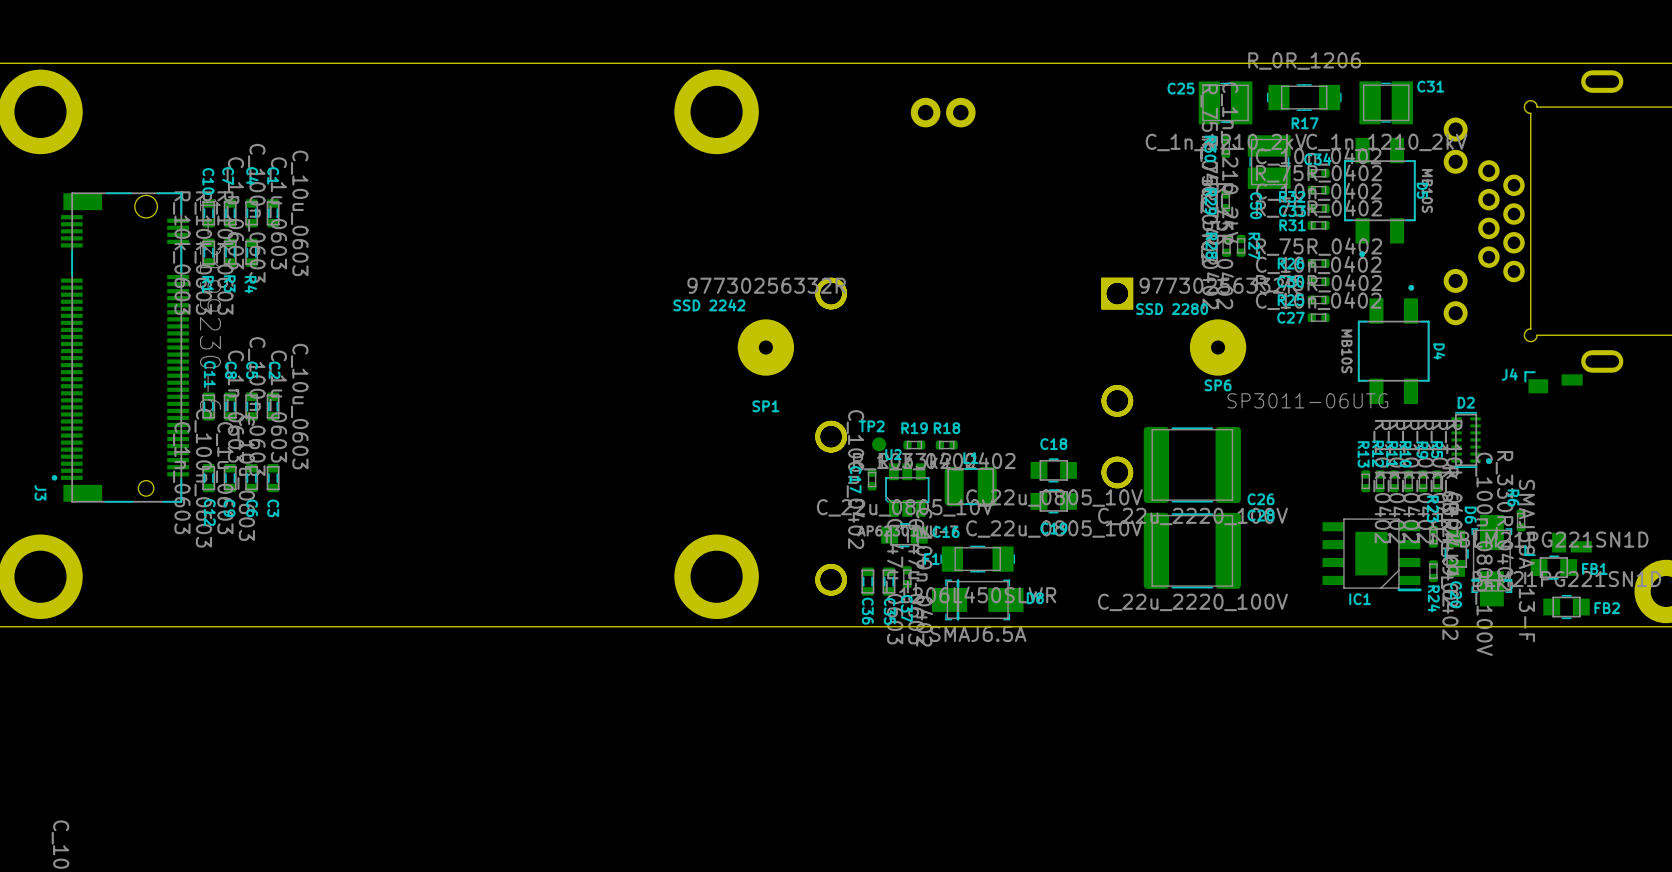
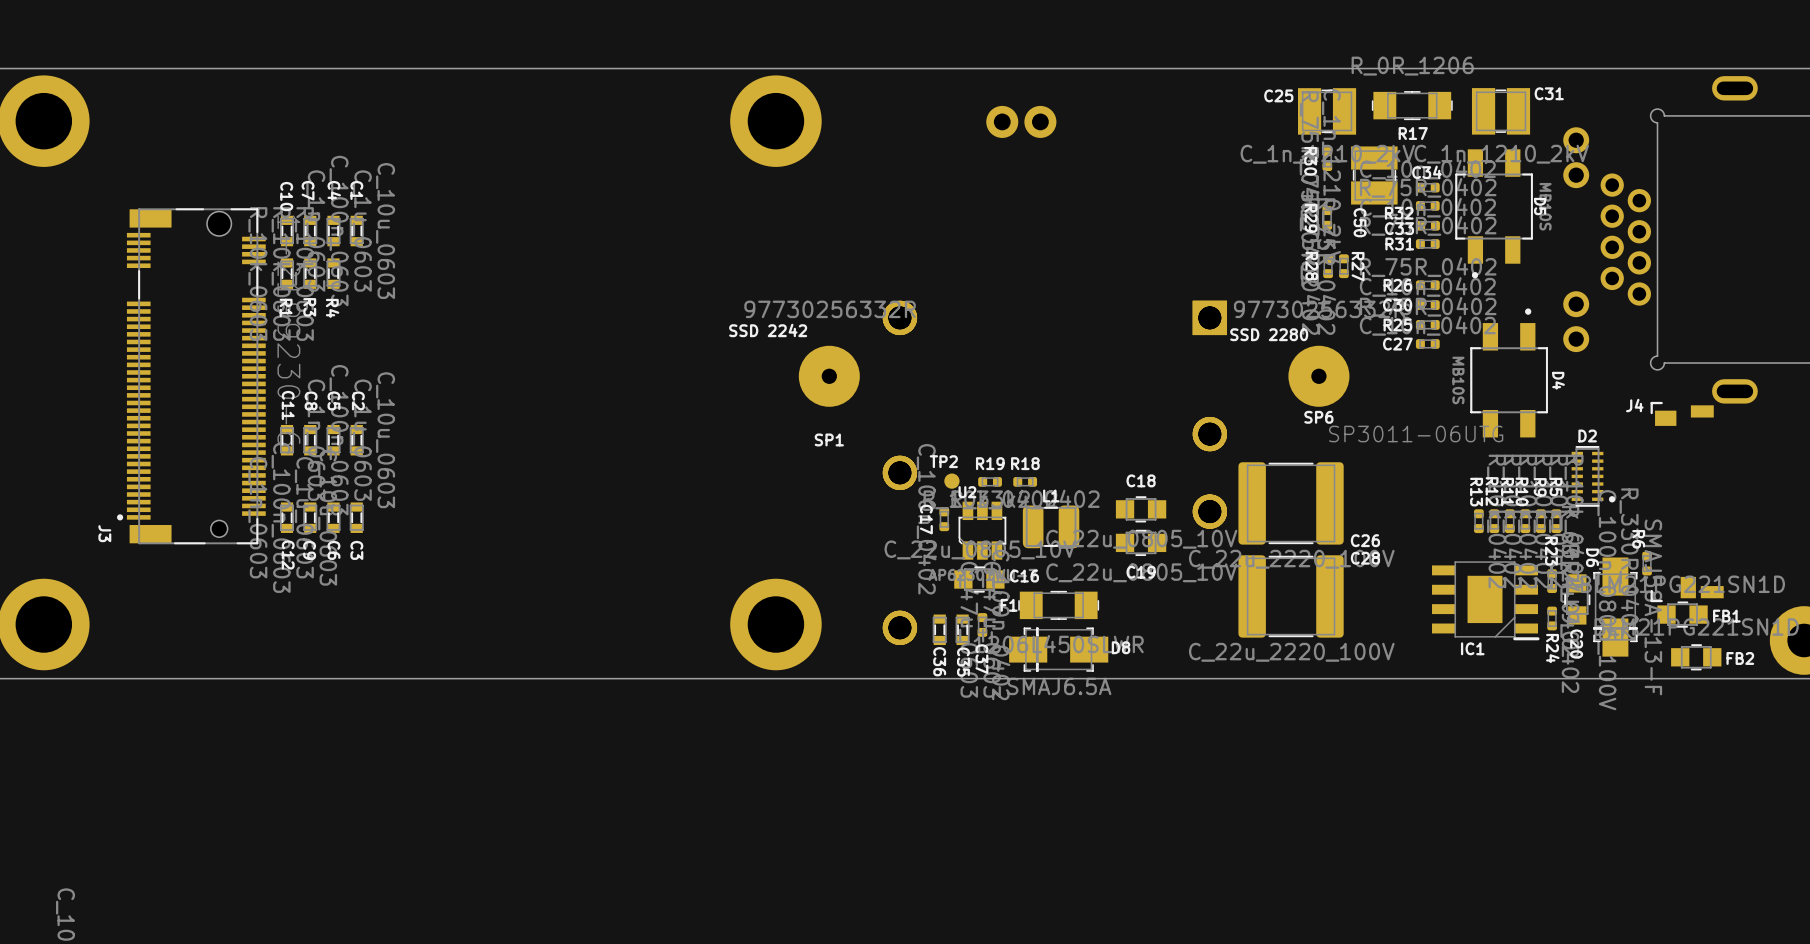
C10 position: (208, 213) -> (287, 231)
C7 position: (230, 213) -> (310, 231)
C4 position: (251, 213) -> (333, 231)
C1 position: (273, 213) -> (356, 231)
R1 position: (208, 252) -> (287, 273)
R3 position: (230, 252) -> (310, 273)
R4 position: (251, 252) -> (333, 273)
J3 position: (120, 347) -> (191, 376)
C11 position: (208, 406) -> (287, 440)
C8 position: (230, 406) -> (310, 440)
C5 position: (251, 406) -> (333, 440)
C2 position: (273, 406) -> (356, 440)
C12 position: (208, 478) -> (287, 517)
C9 position: (230, 478) -> (310, 517)
C6 position: (251, 478) -> (333, 517)
C3 position: (273, 478) -> (356, 517)

